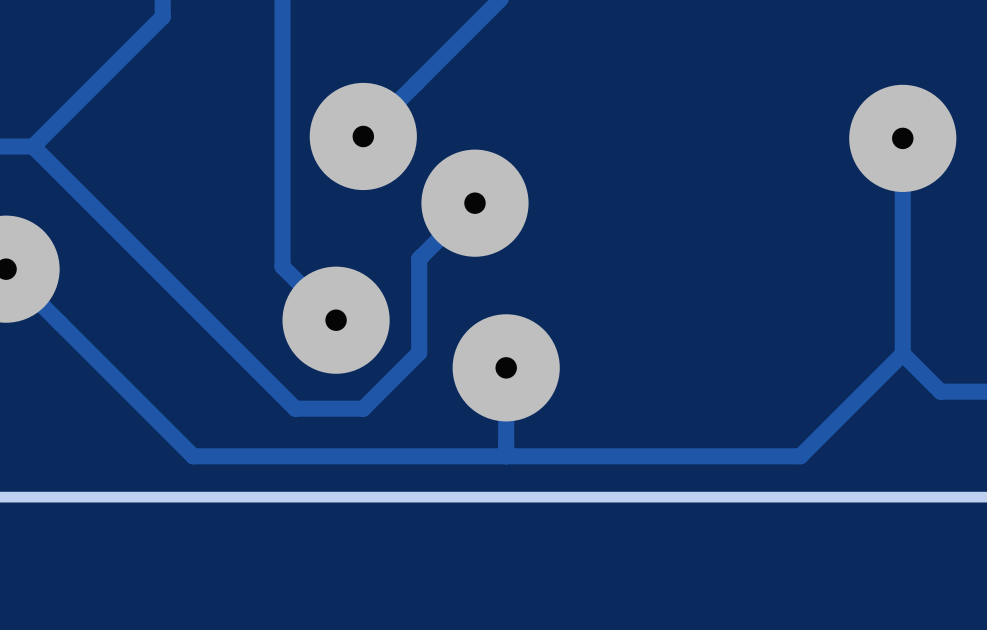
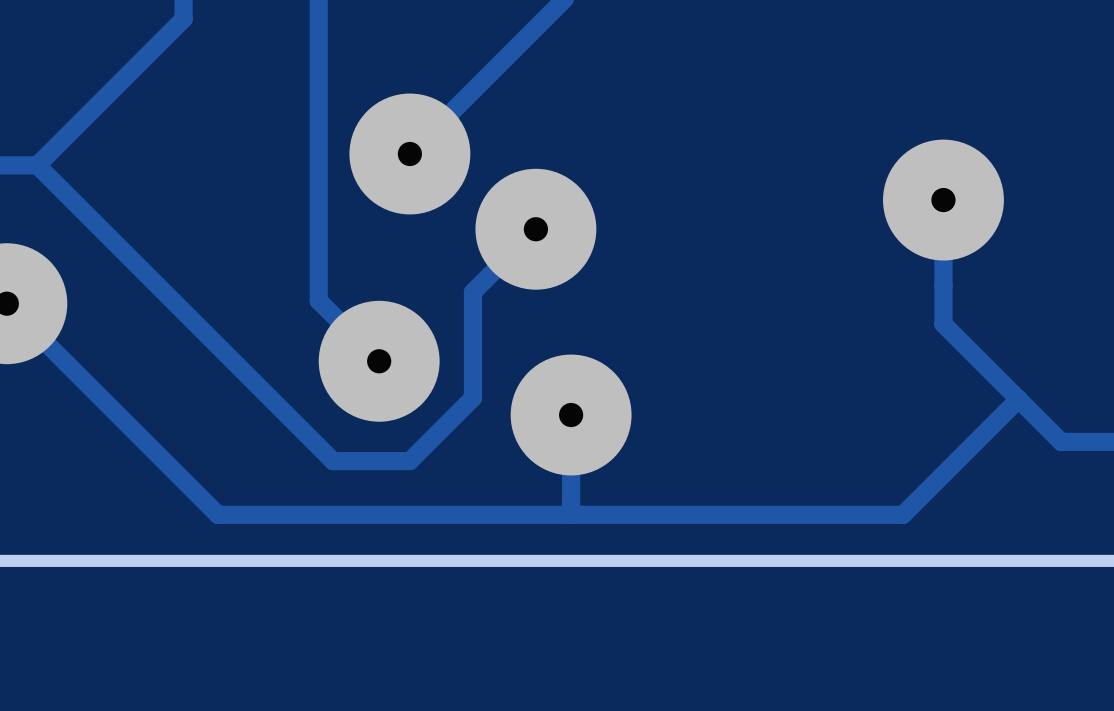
track: (902, 138) (902, 353) -> (943, 200) (943, 324) (1018, 399)
via position: (902, 138) -> (943, 200)

